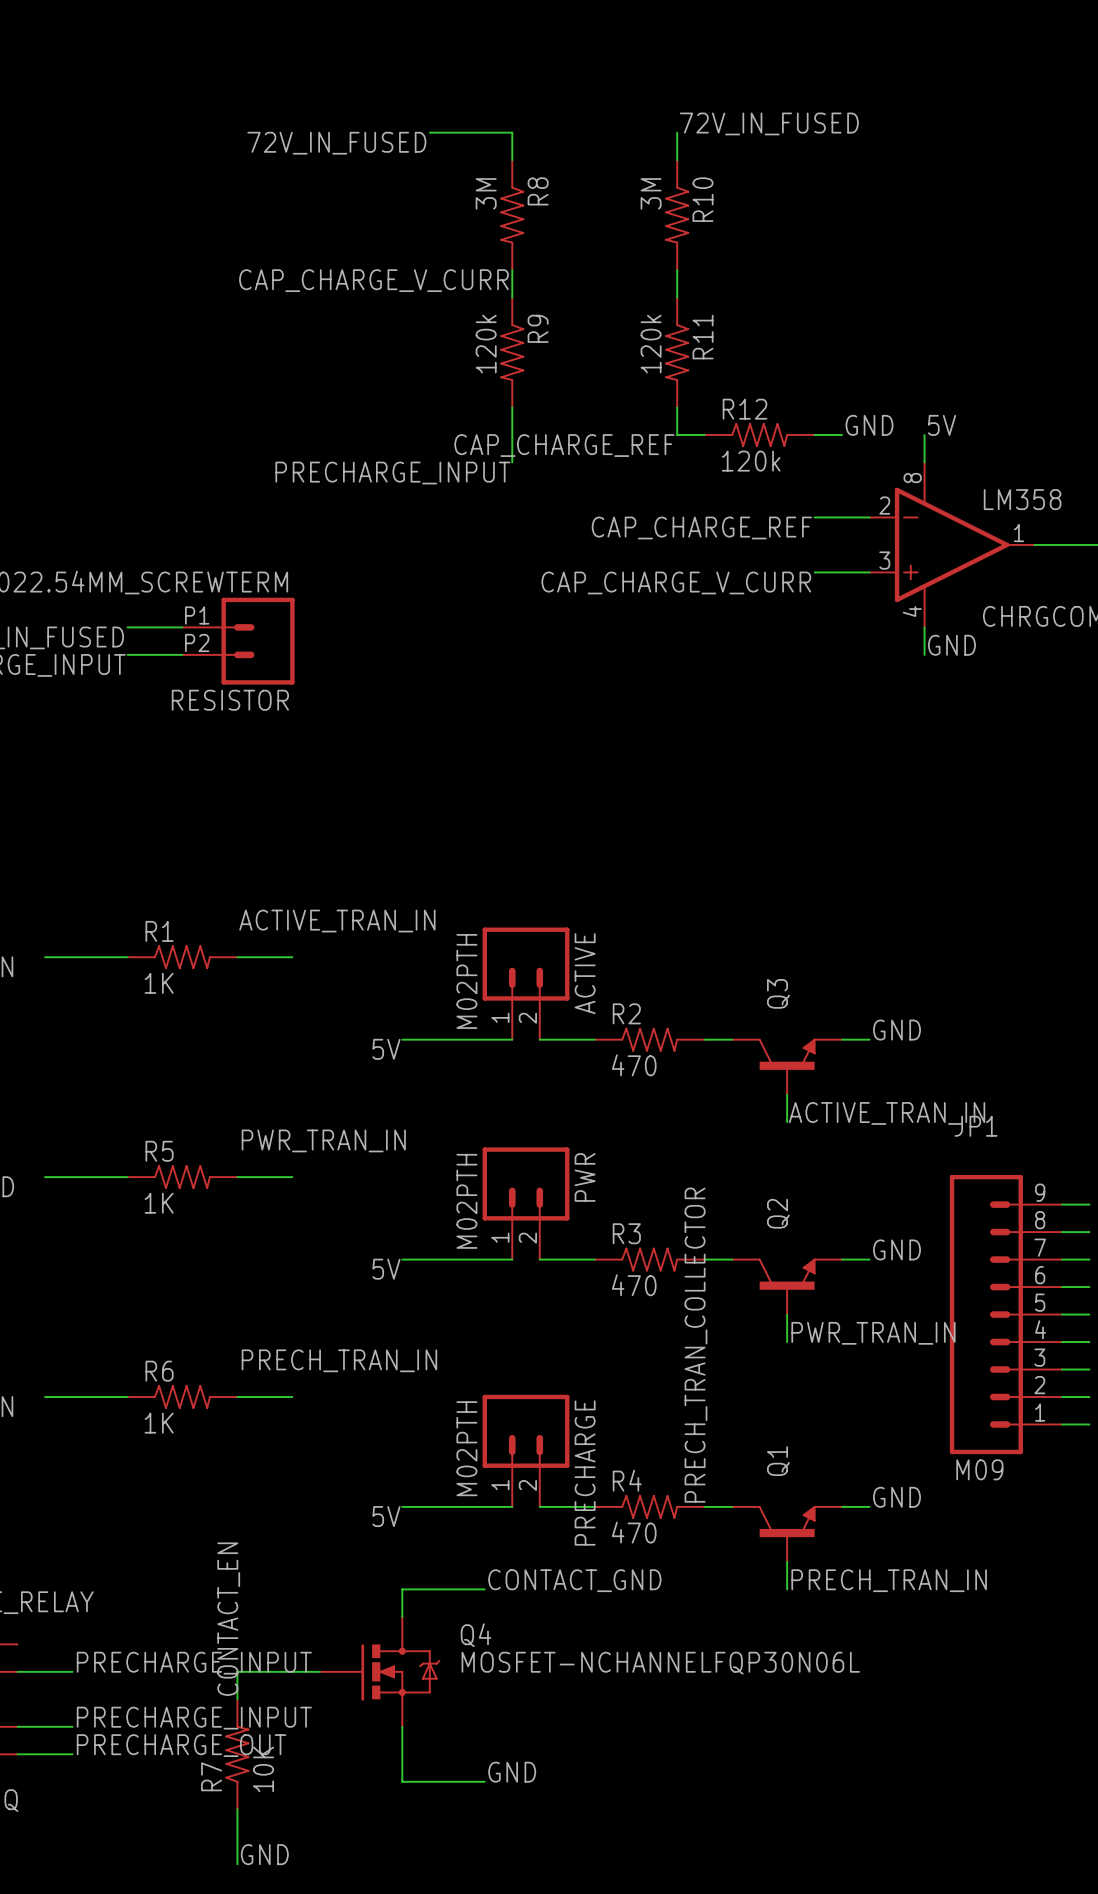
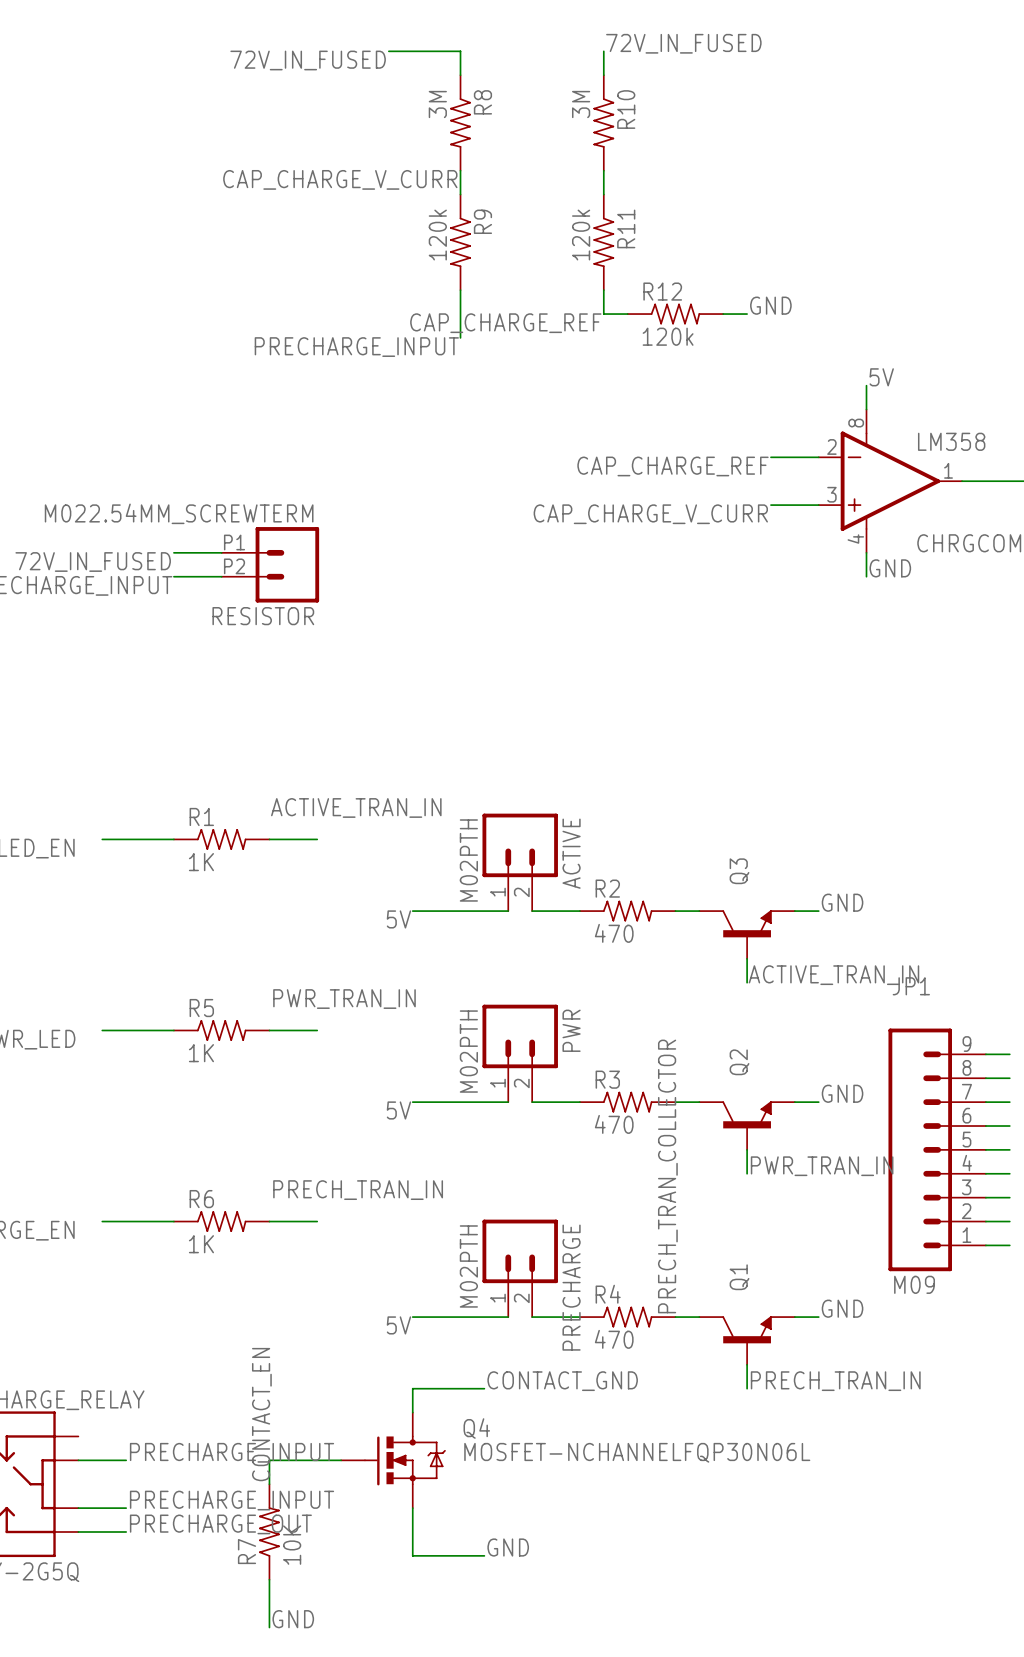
label position: 72V_IN_FUSED (769, 123) -> 72V_IN_FUSED (683, 43)
wire: (429, 132) (512, 132) (512, 160) -> (388, 51) (460, 51) (460, 75)
wire: (677, 132) (677, 160) -> (603, 51) (603, 75)
label position: 72V_IN_FUSED (336, 143) -> 72V_IN_FUSED (308, 60)
R8 position: (512, 215) -> (460, 122)
R10 position: (677, 215) -> (603, 122)
wire: (512, 270) (512, 297) -> (460, 170) (460, 194)
wire: (677, 270) (677, 297) -> (603, 170) (603, 194)
label position: CAP_CHARGE_V_CURR (373, 280) -> CAP_CHARGE_V_CURR (340, 179)
R9 position: (512, 352) -> (460, 242)
R11 position: (677, 352) -> (603, 242)
wire: (512, 407) (512, 462) -> (460, 290) (460, 337)
wire: (677, 407) (677, 435) (704, 435) -> (603, 290) (603, 314) (627, 314)
label position: GND (869, 425) -> GND (770, 305)
R12 position: (759, 435) -> (675, 314)
wire: (814, 435) (842, 435) -> (723, 314) (747, 314)
label position: CAP_CHARGE_REF (564, 445) -> CAP_CHARGE_REF (505, 323)
label position: PRECHARGE_INPUT (392, 473) -> PRECHARGE_INPUT (356, 347)

